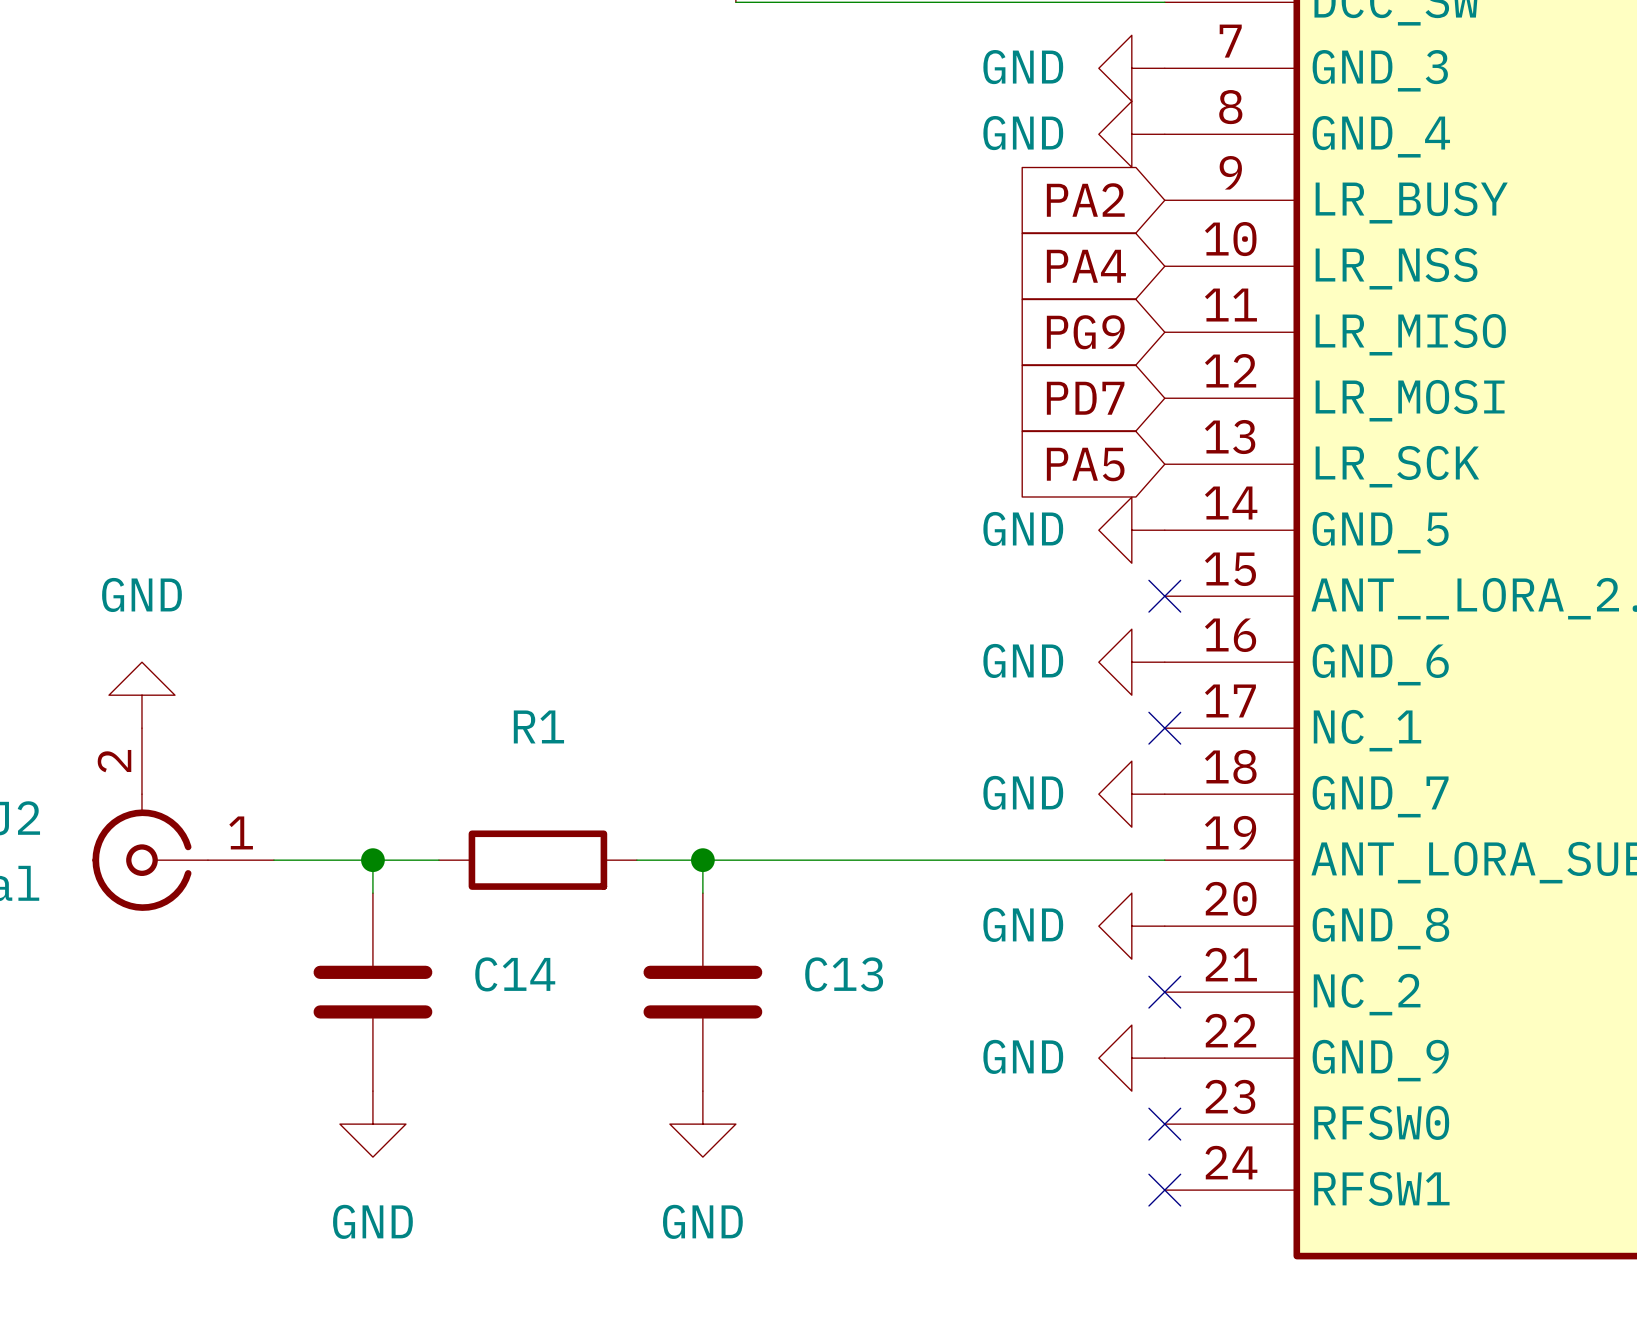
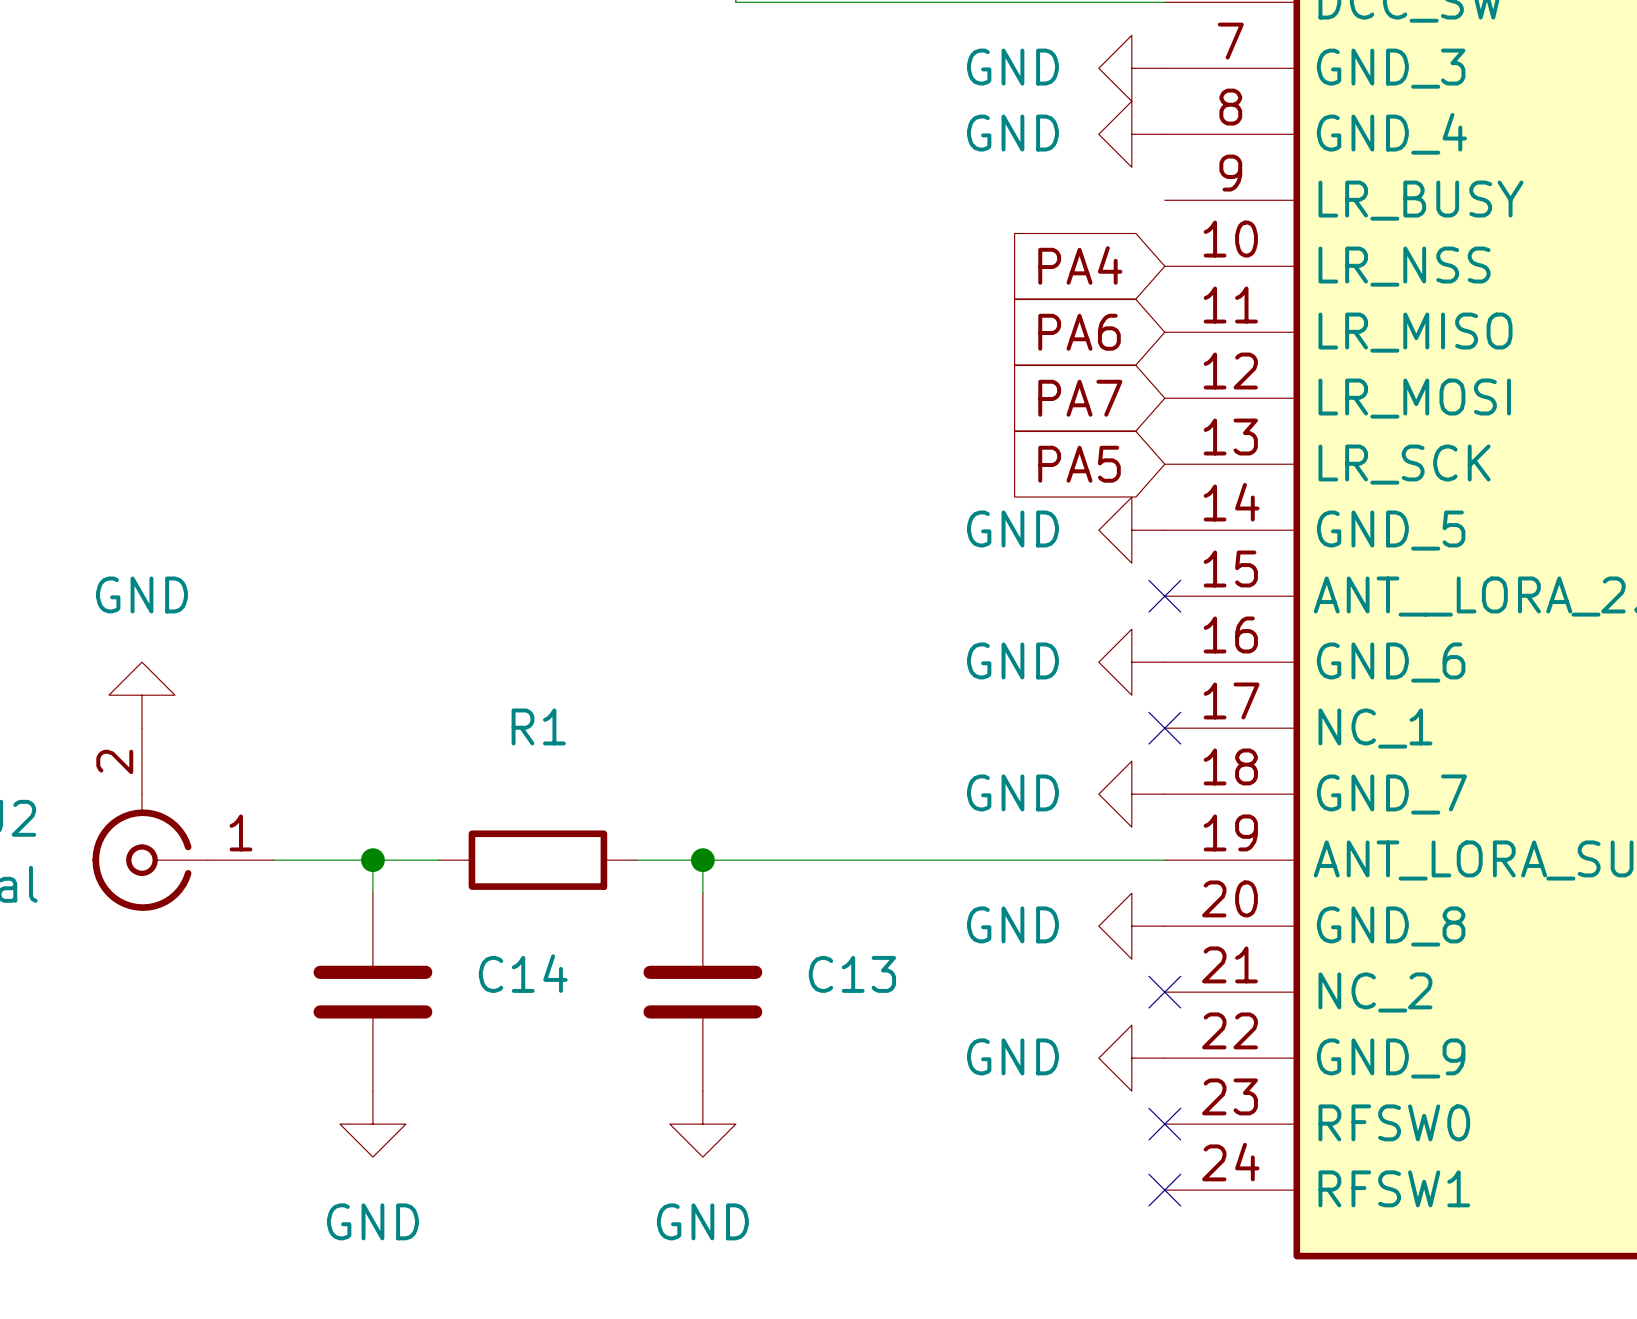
global label: PA2 (1085, 199) -> none
global label: PG9 (1085, 332) -> PA6 (1079, 332)
global label: PD7 (1085, 398) -> PA7 (1080, 398)

